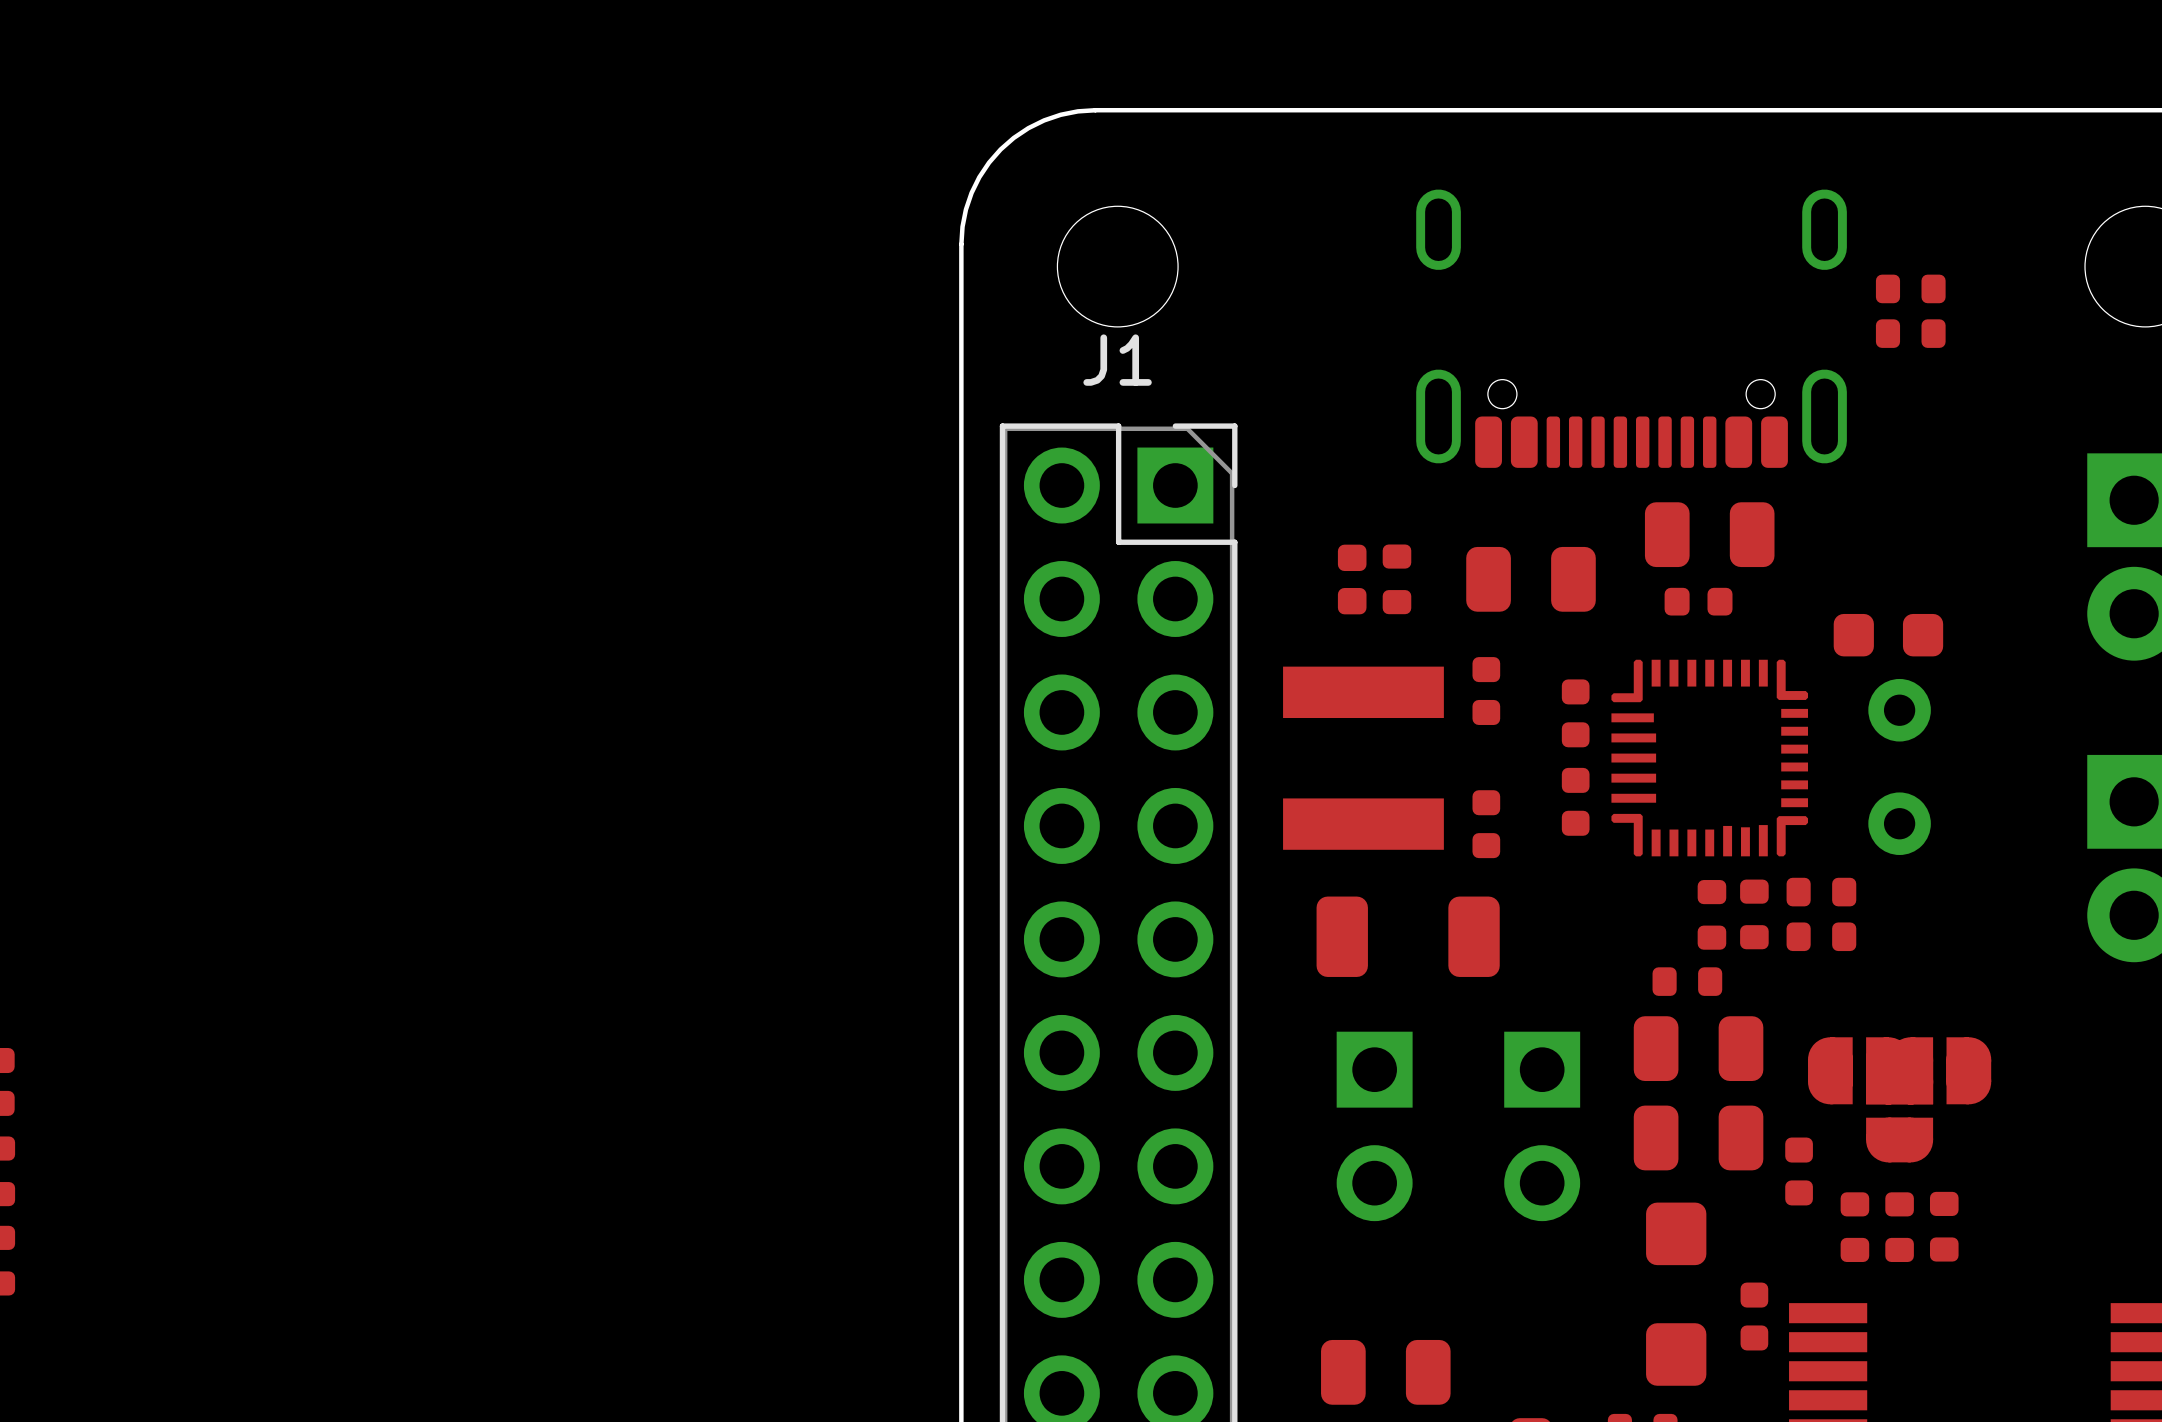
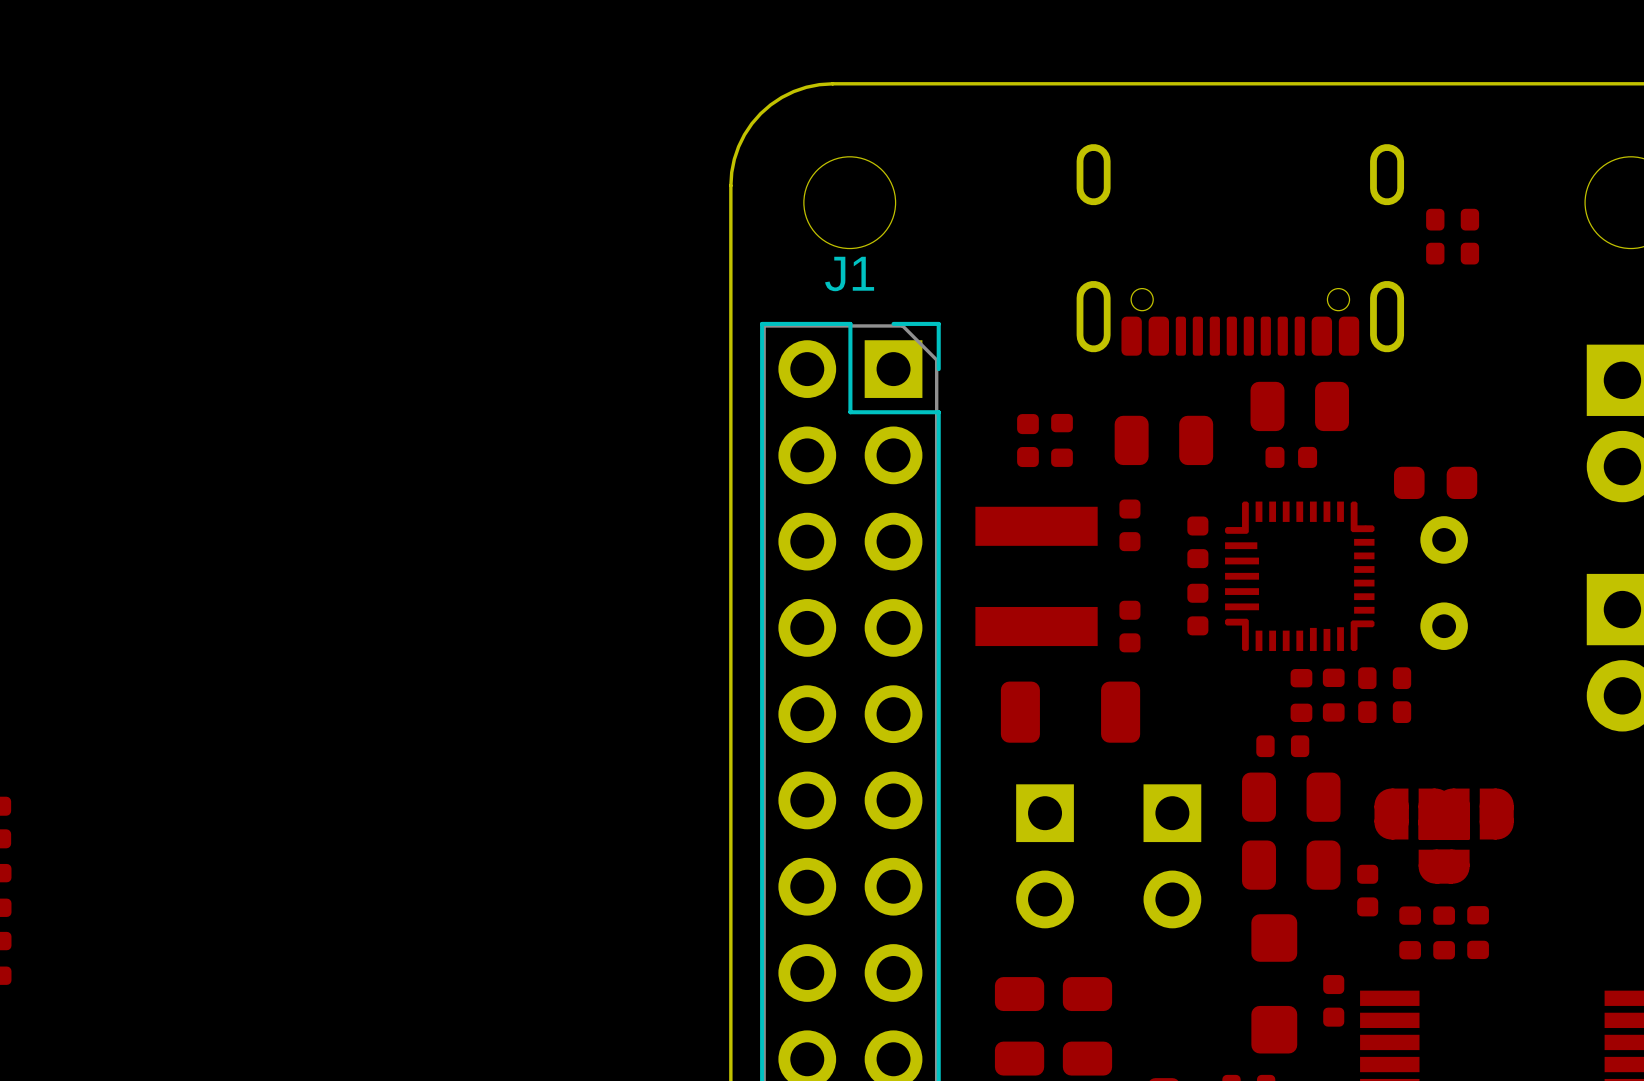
part: none -> (1019, 1026)
part: none -> (1087, 1026)
part: (1385, 1372) -> none

